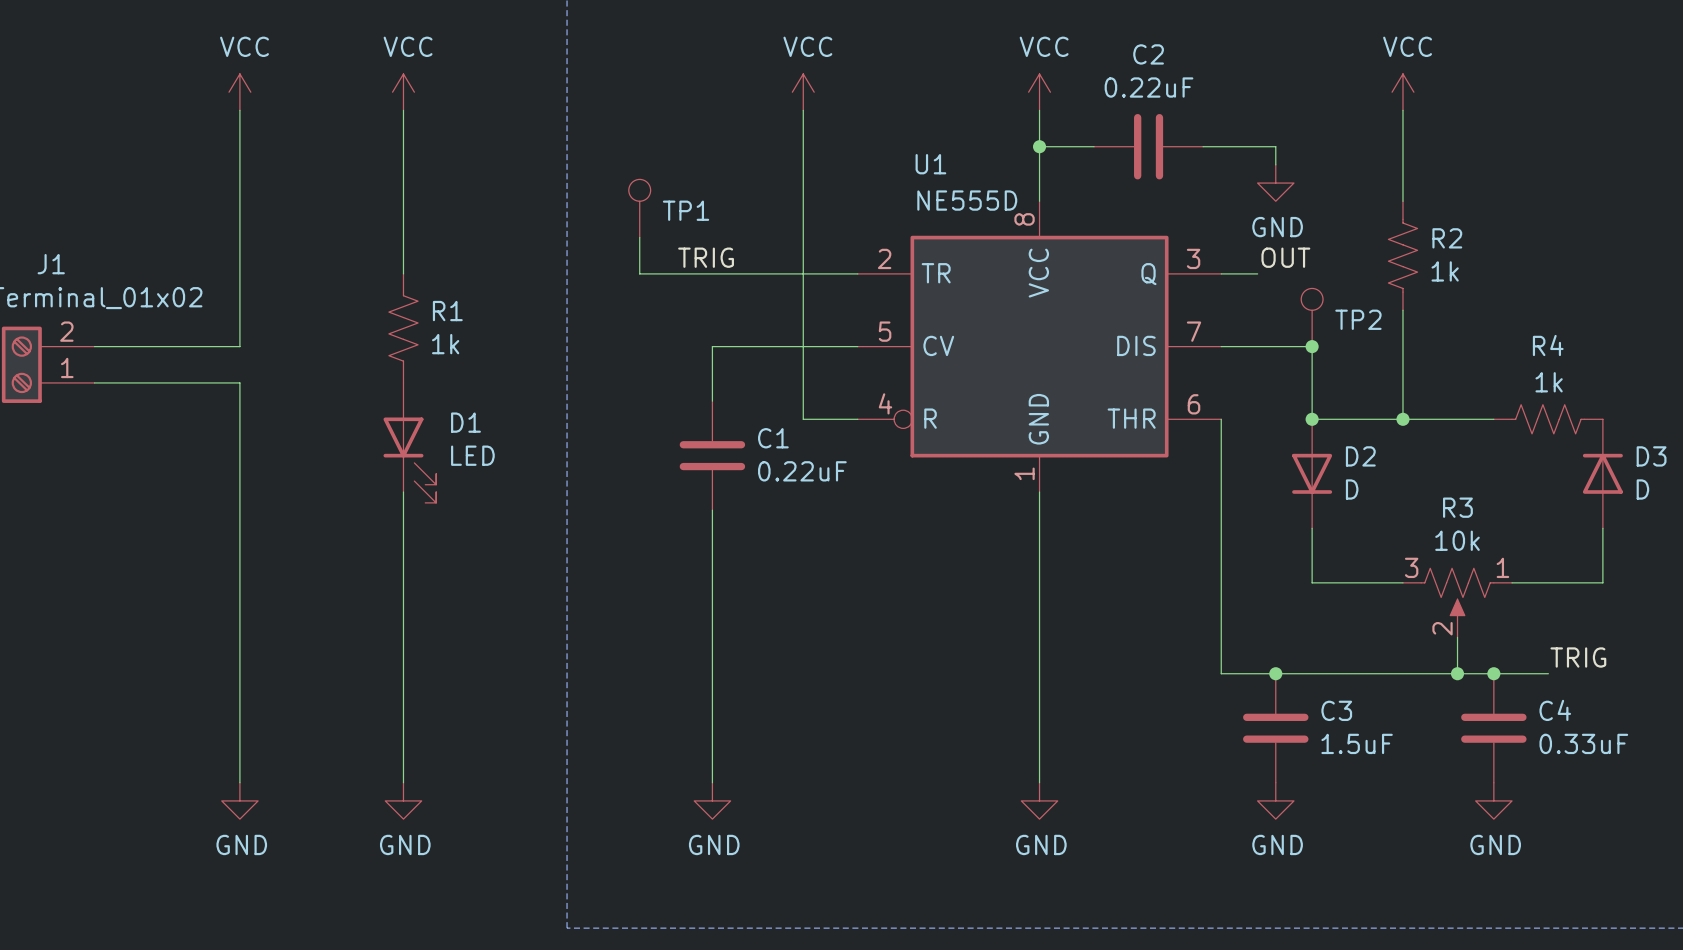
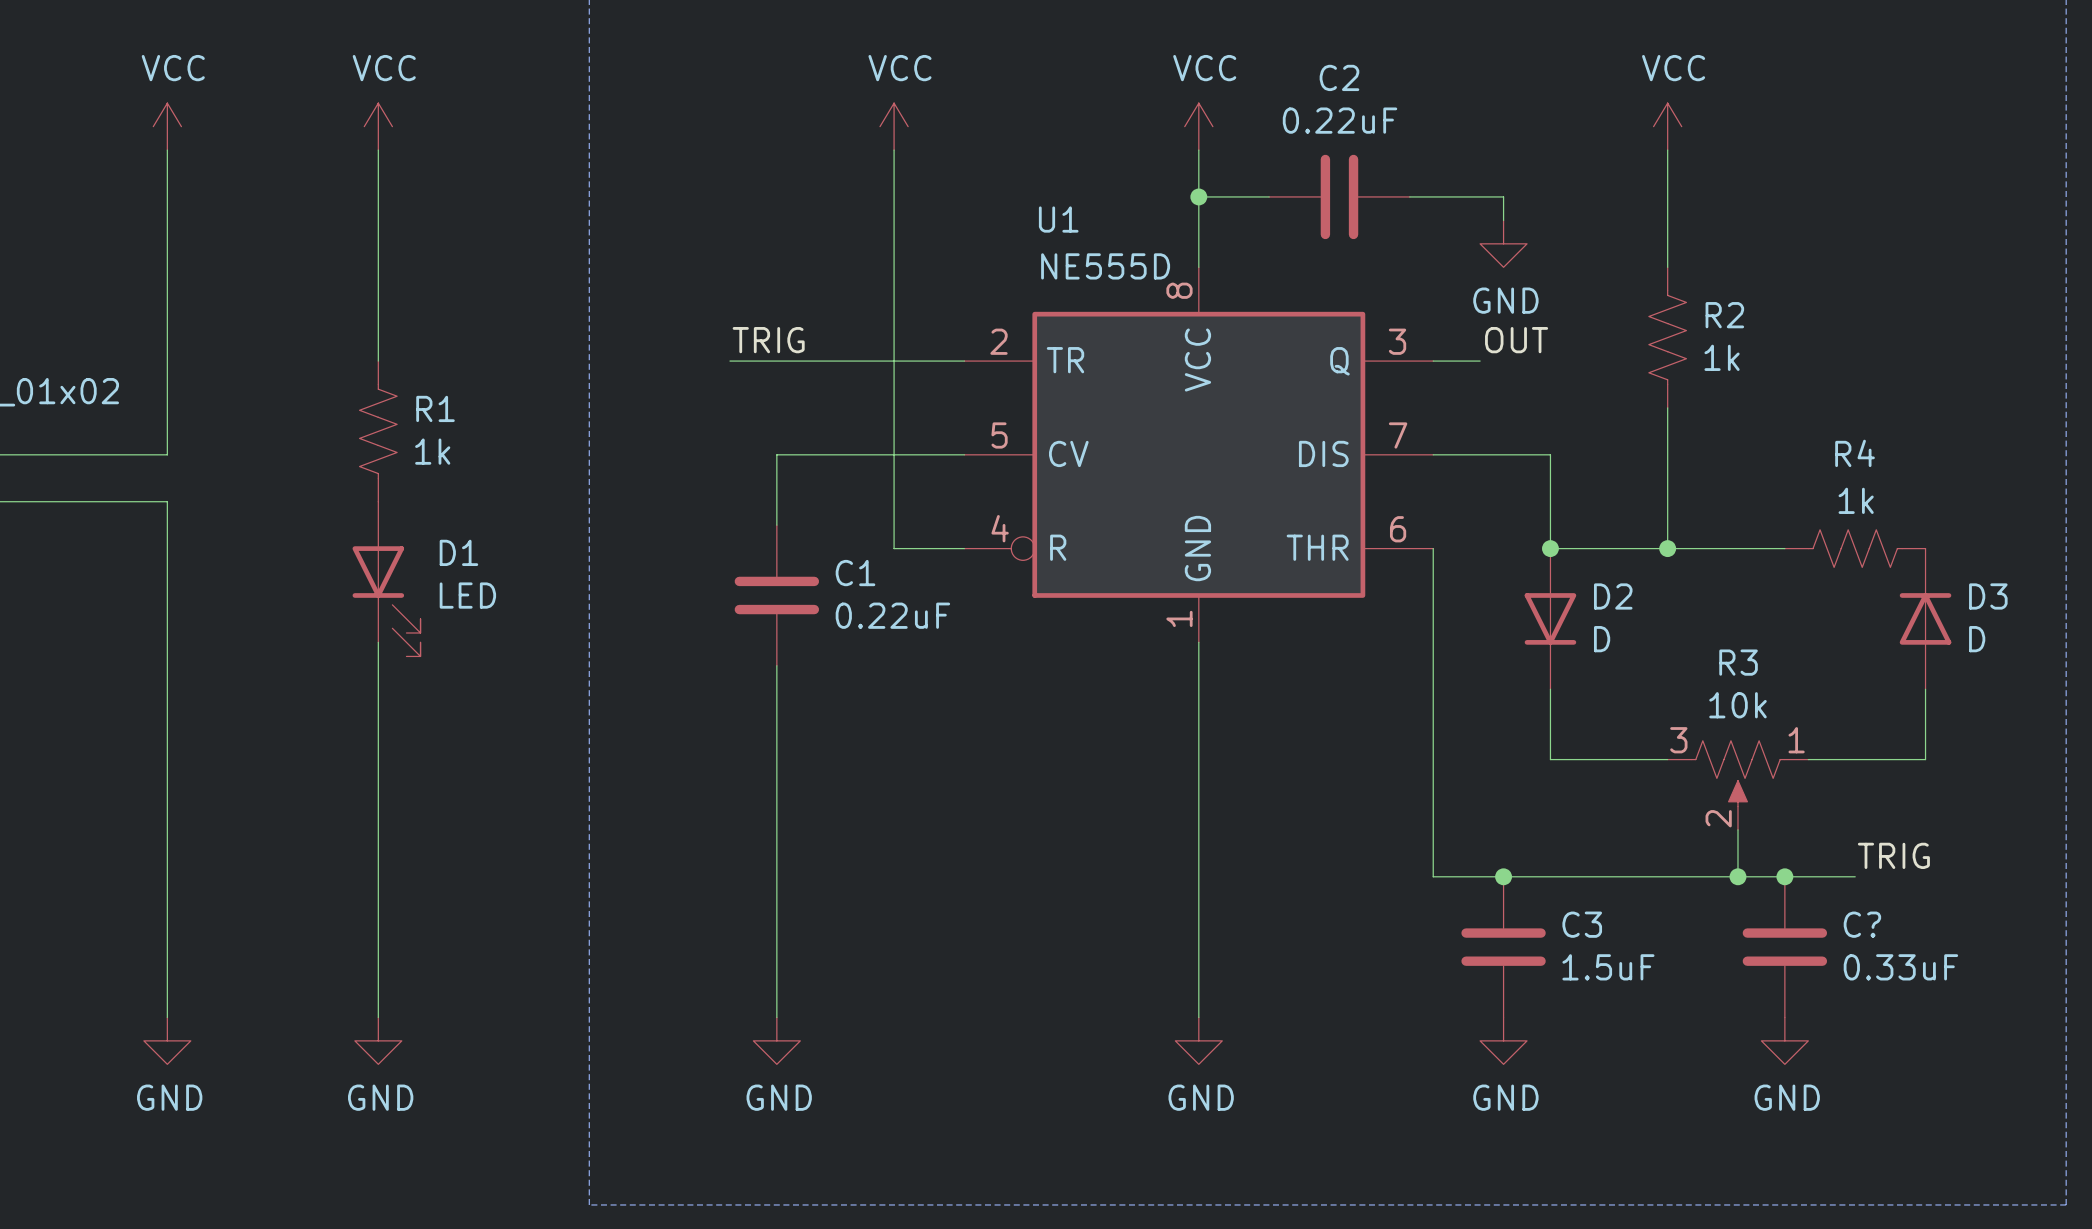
TP1: (639, 208) -> none
wire: (639, 237) (639, 273) (676, 273) -> none
TP2: (1312, 317) -> none
junction: (1312, 346) -> none
C4 name: C4 (1555, 710) -> C? (1862, 924)

